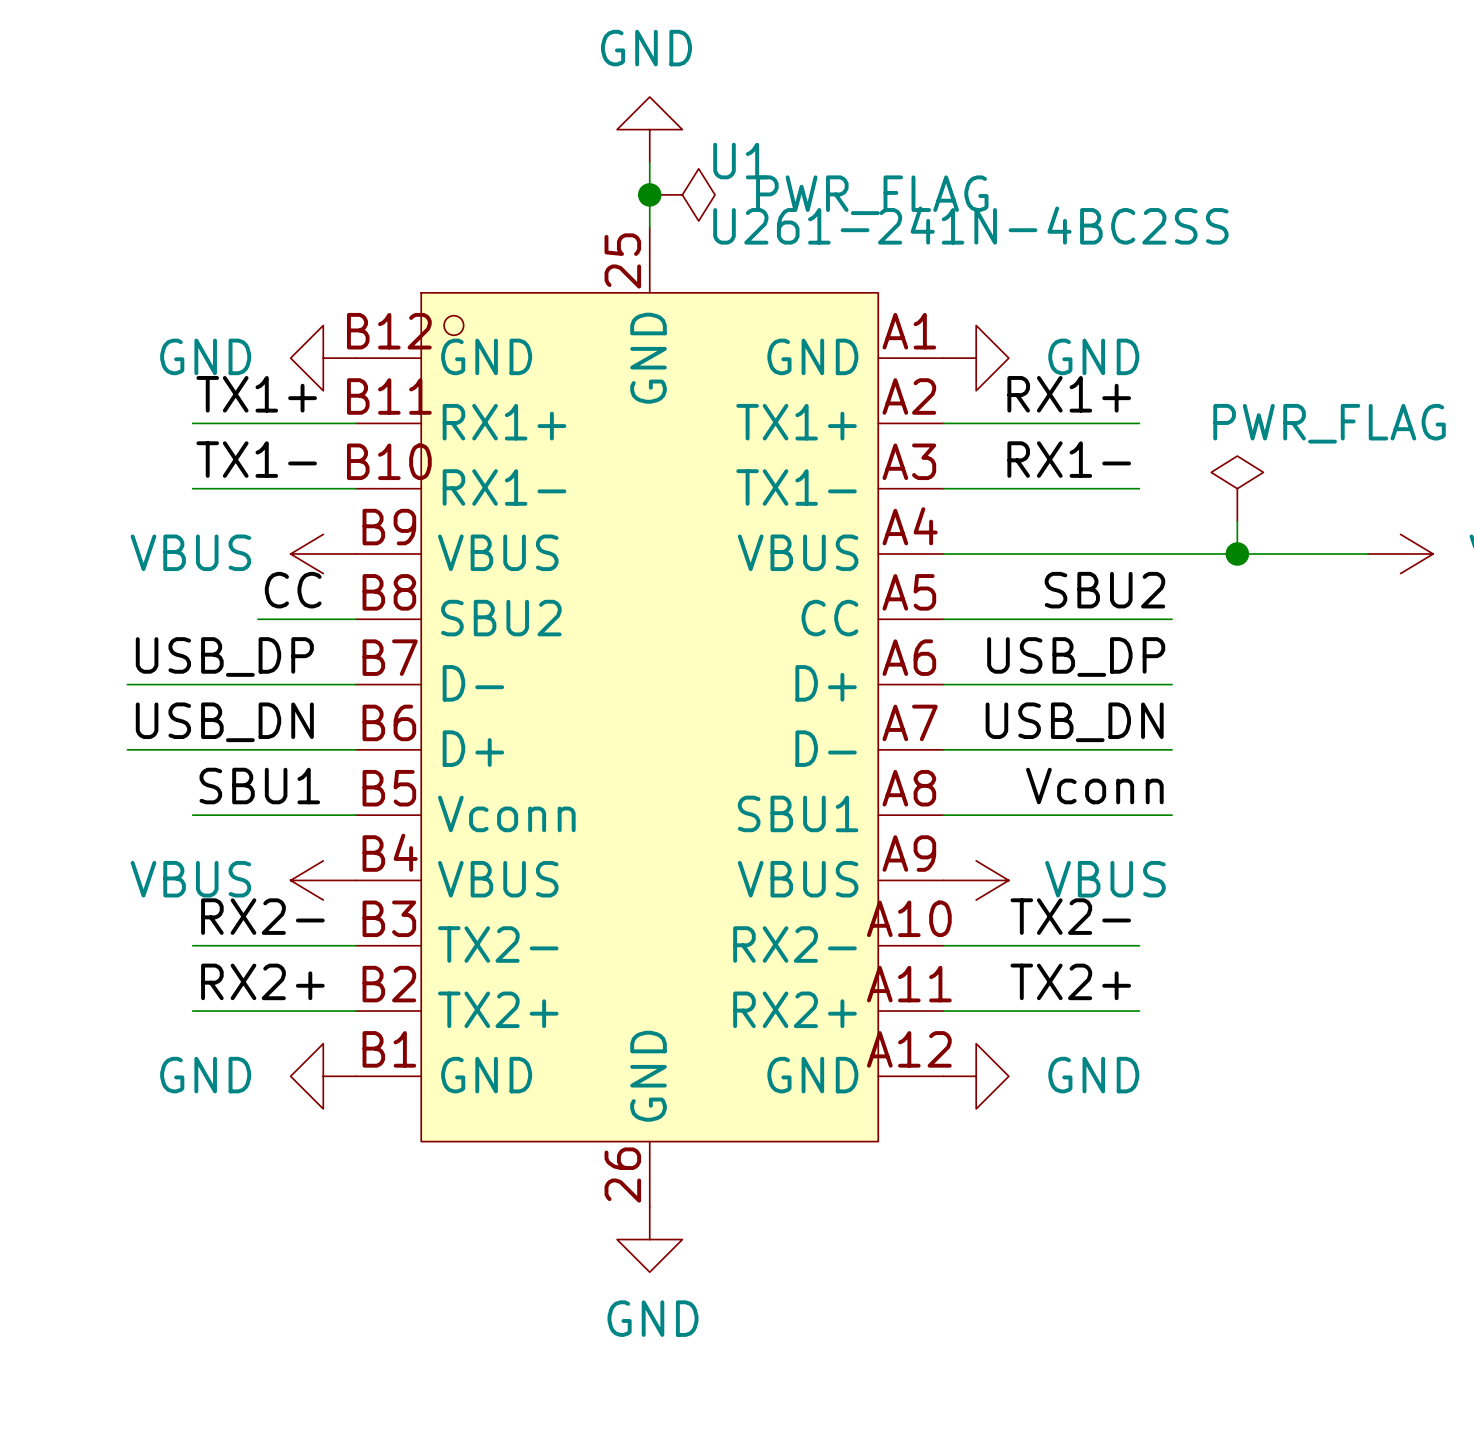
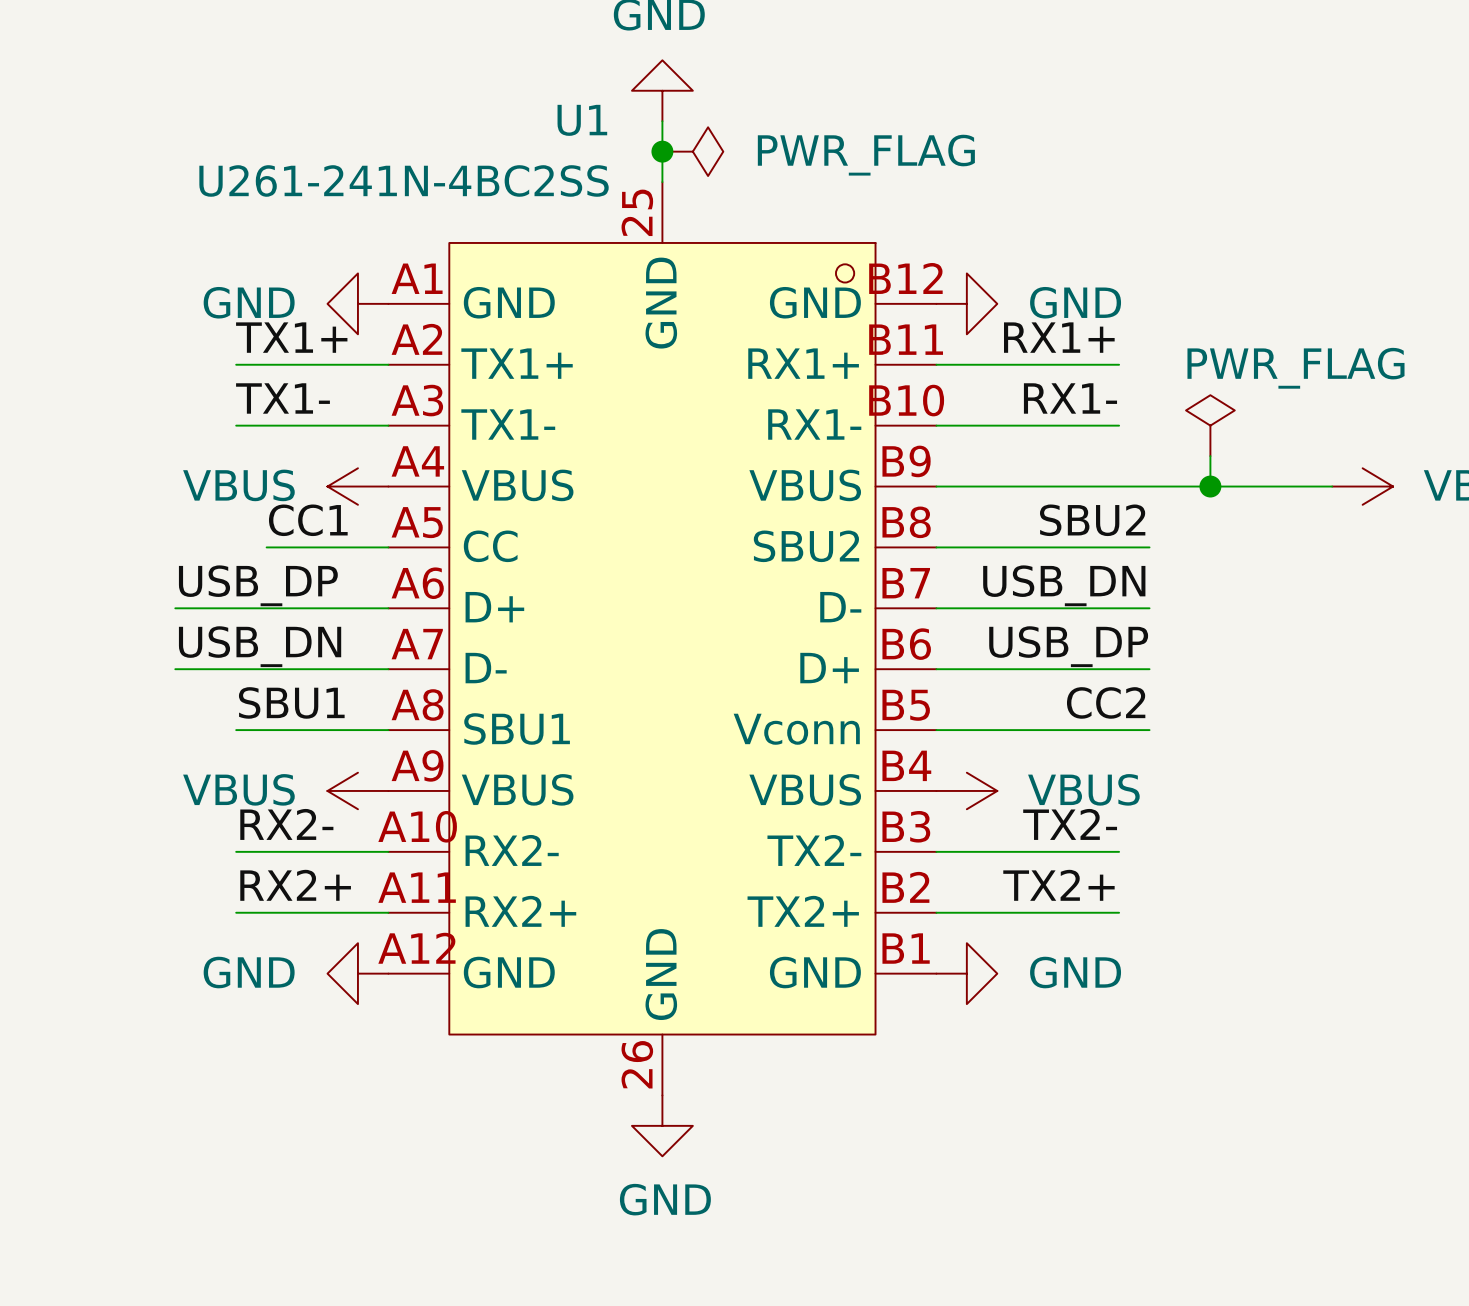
label: CC (293, 590) -> CC1 (308, 520)
wire: none -> (266, 547) (297, 547)
label: USB_DP (1076, 657) -> USB_DN (1064, 585)
U1 flip: as is (649, 717) -> left-right (662, 638)
label: USB_DN (1074, 722) -> USB_DP (1068, 646)
label: Vconn (1094, 786) -> CC2 (1106, 702)

